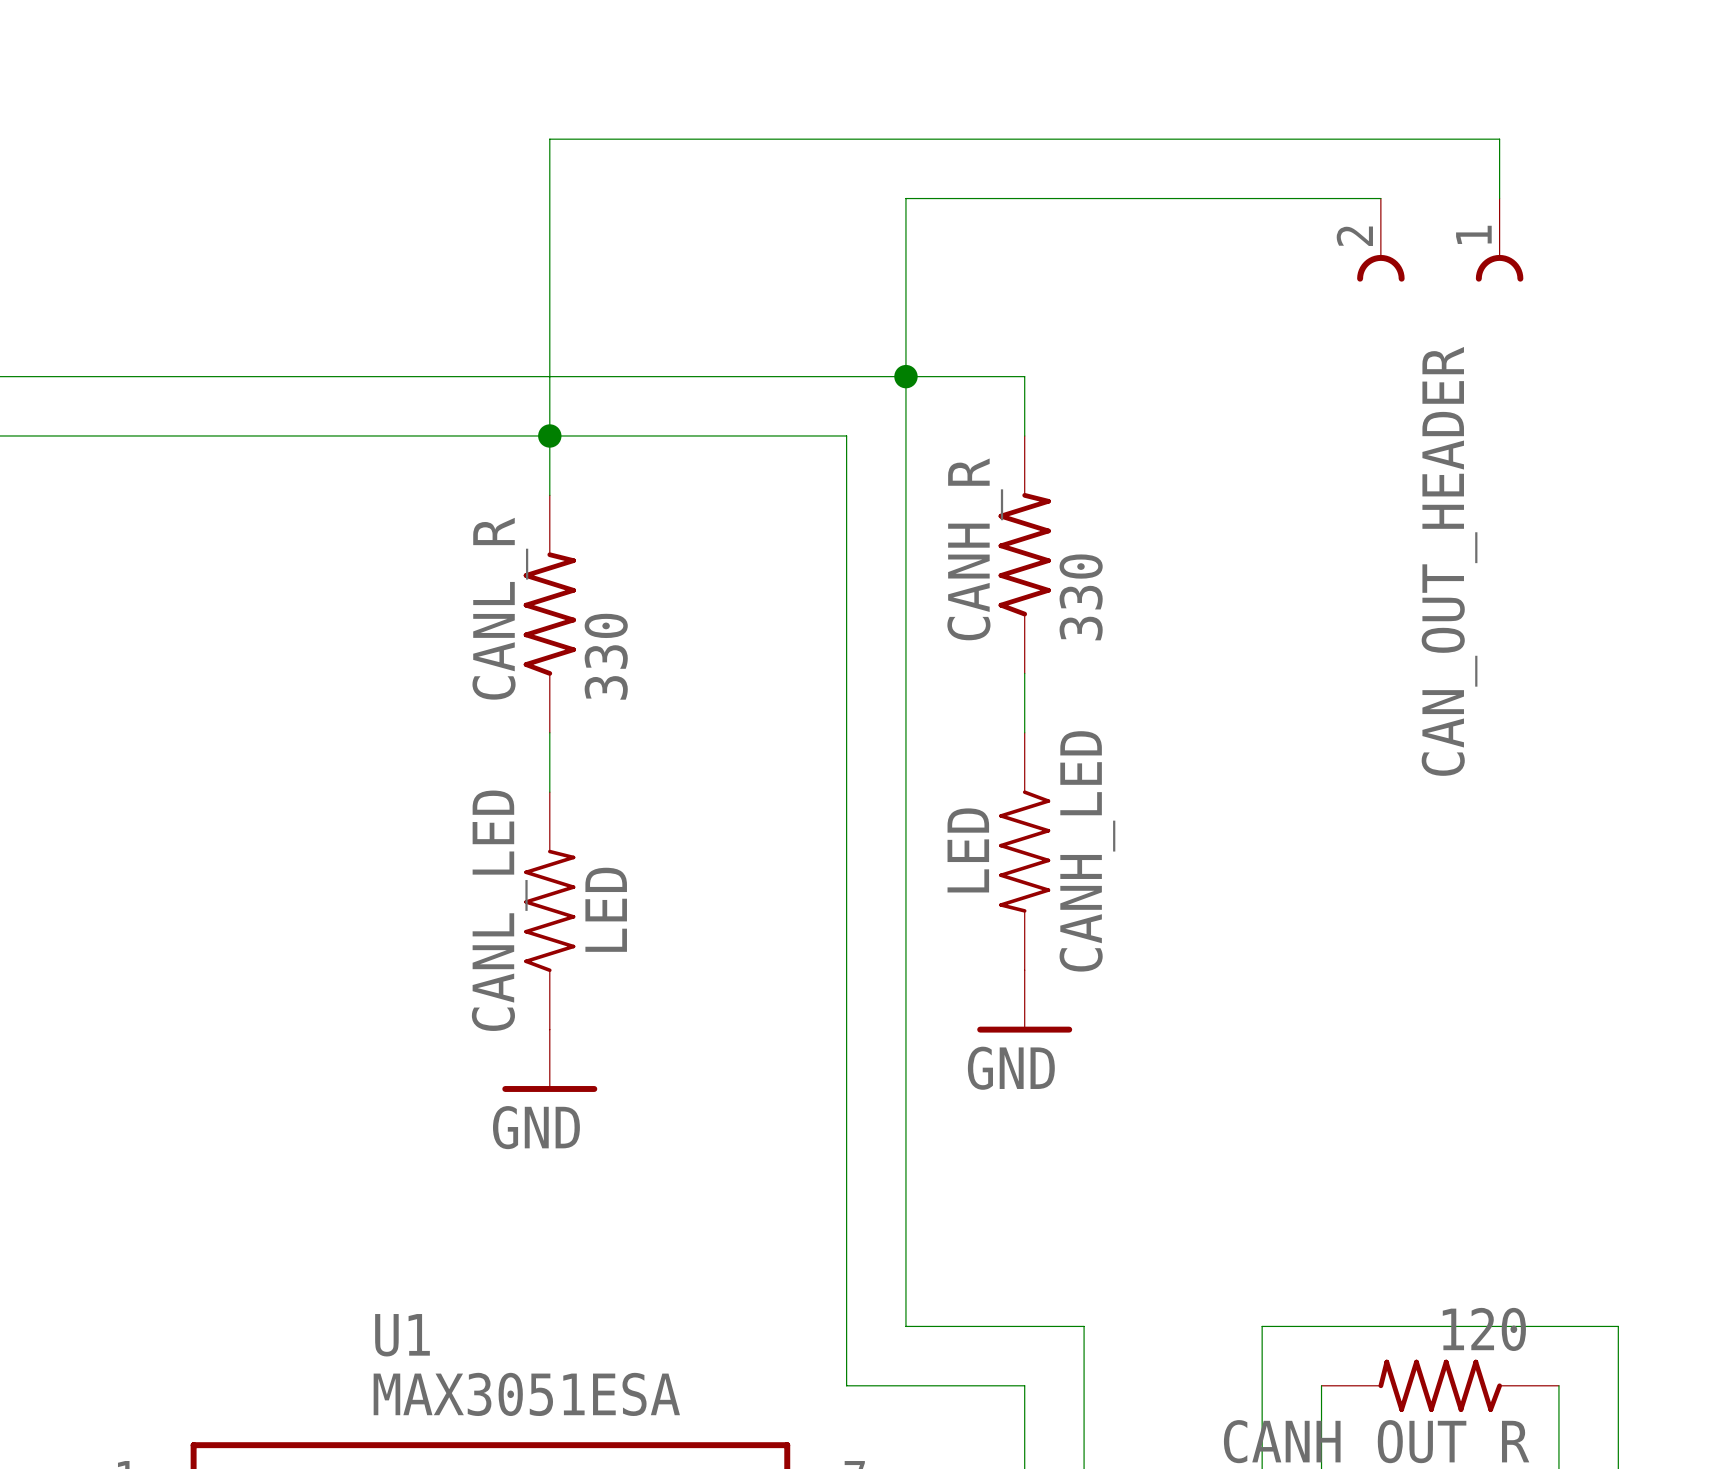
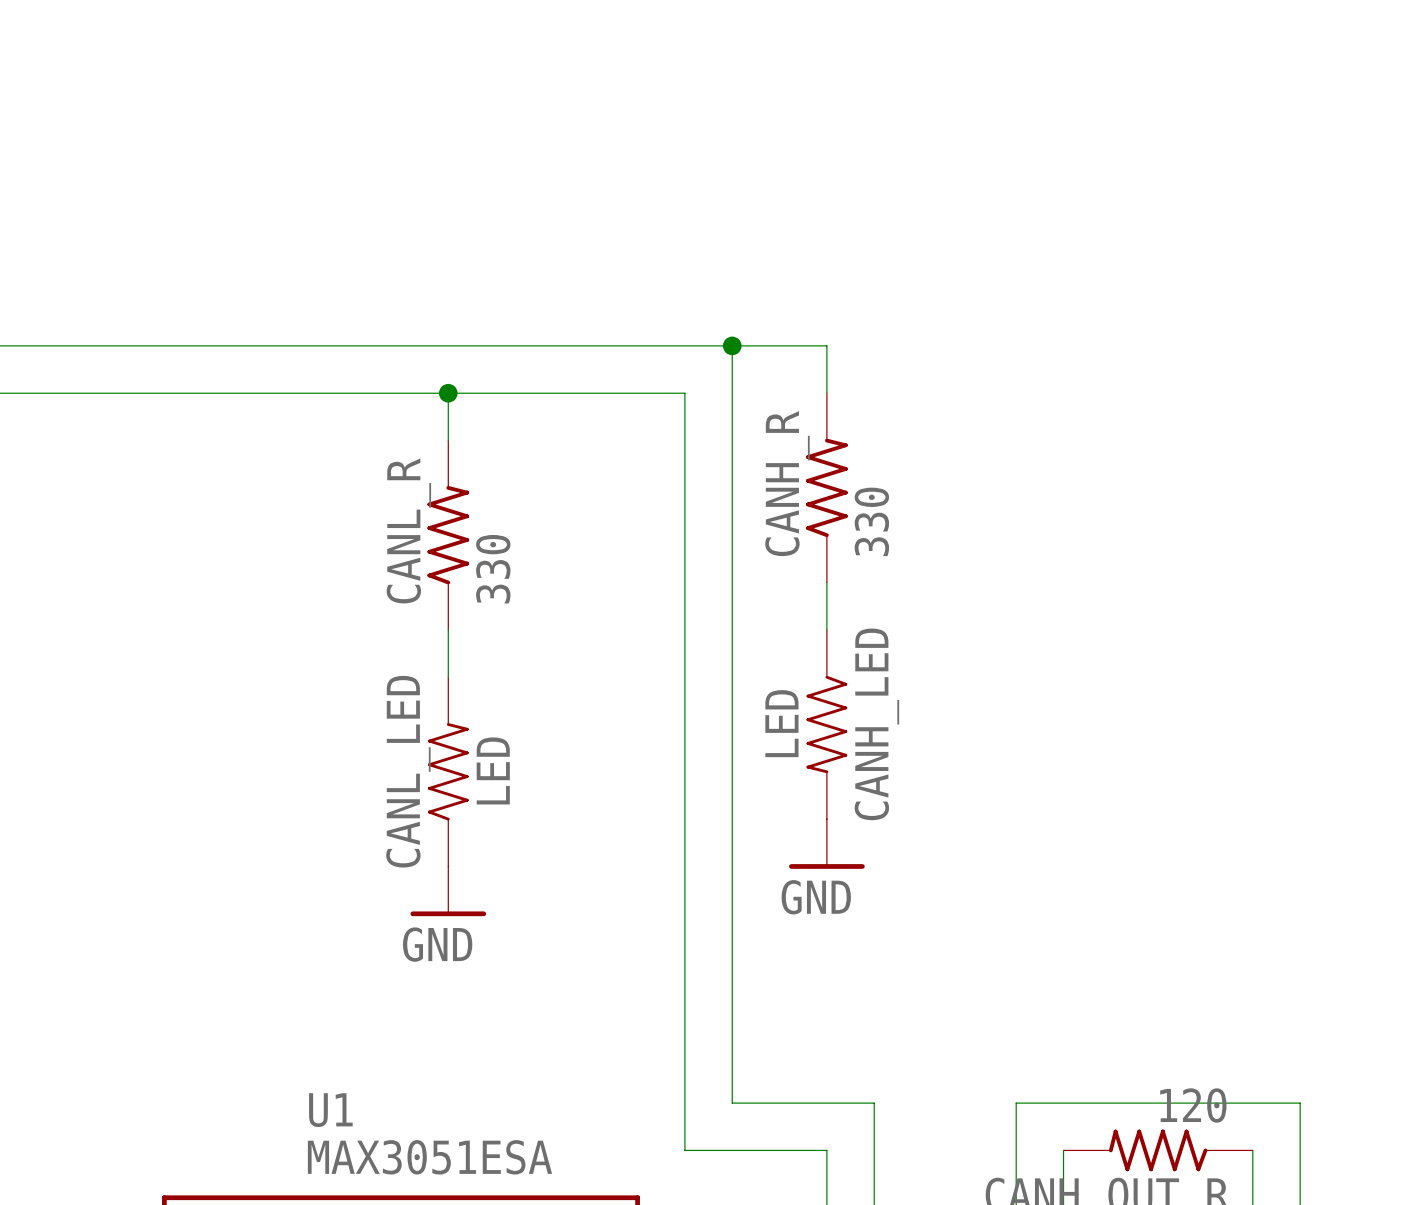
wire: (1380, 198) (905, 198) (905, 376) -> none
wire: (1499, 198) (1499, 139) (549, 139) (549, 435) -> none
CAN_OUT_HEADER: (1440, 240) -> none

